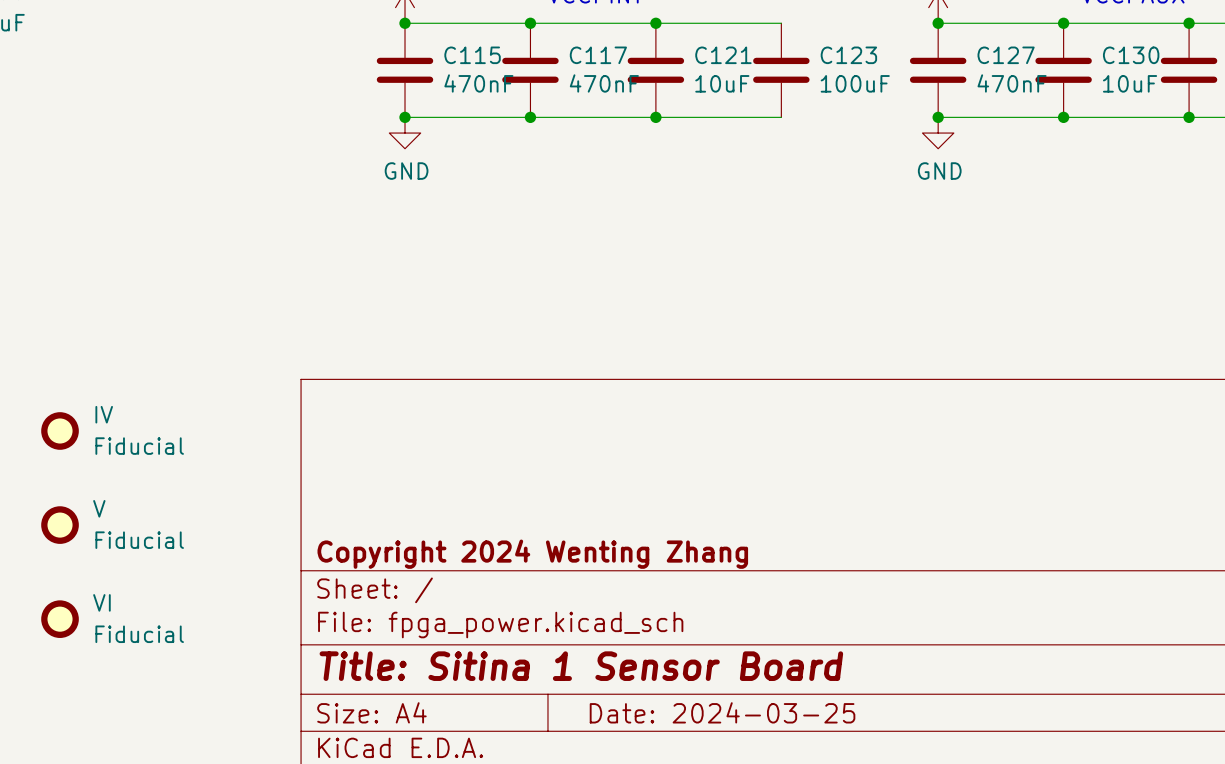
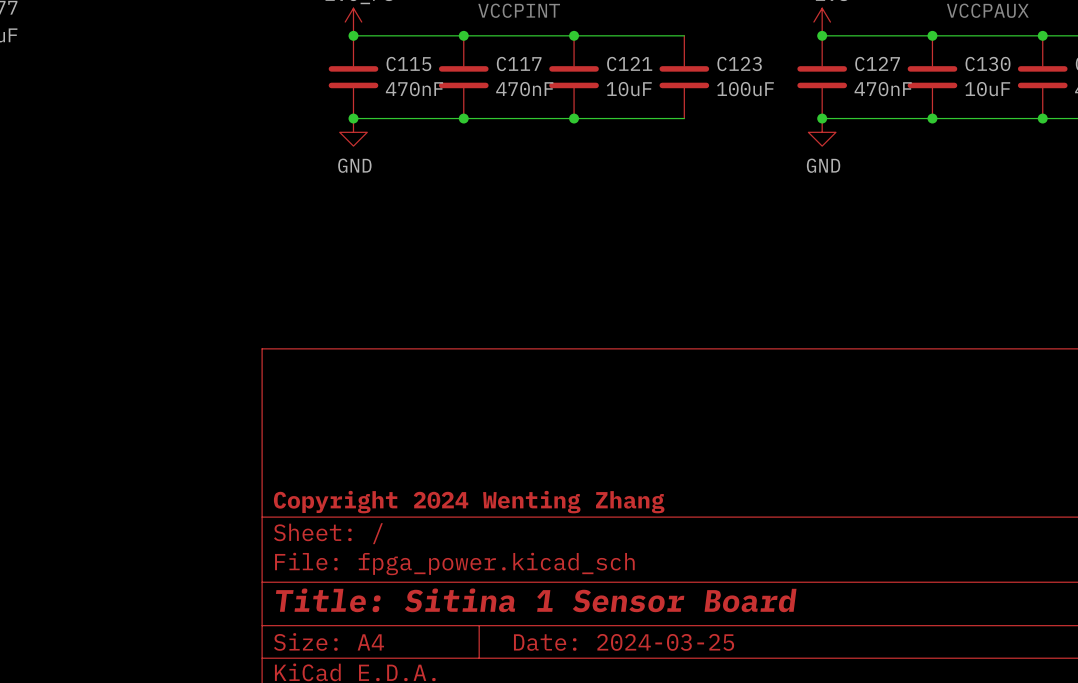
IV: Fiducial (60, 430) -> none
V: Fiducial (60, 525) -> none
VI: Fiducial (60, 619) -> none

